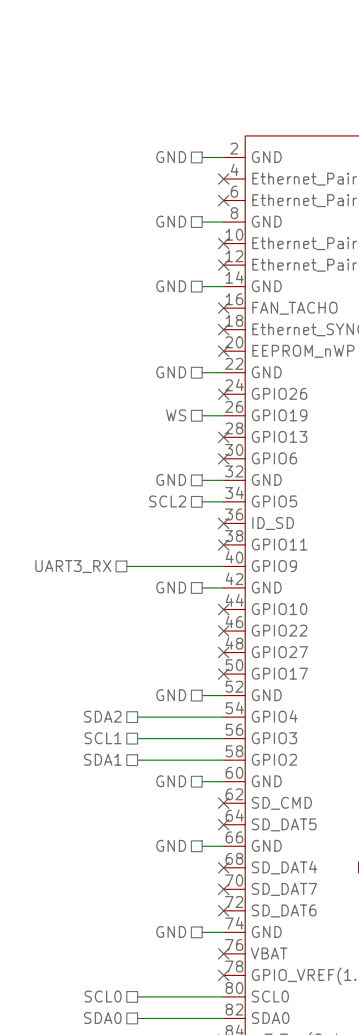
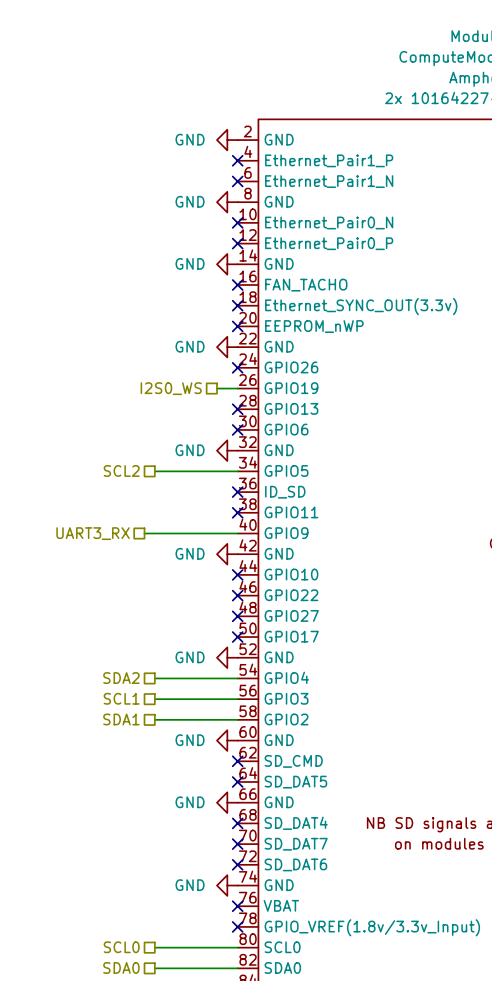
hierarchical label: GND (171, 157) -> none
power symbol: none -> GND (227, 140)
hierarchical label: GND (171, 221) -> none
power symbol: none -> GND (227, 202)
hierarchical label: GND (171, 286) -> none
power symbol: none -> GND (227, 264)
hierarchical label: GND (171, 372) -> none
power symbol: none -> GND (227, 347)
hierarchical label: WS (176, 415) -> I2S0_WS (171, 388)
hierarchical label: GND (171, 479) -> none
power symbol: none -> GND (227, 450)
wire: none -> (154, 471) (216, 471)
hierarchical label position: SCL2 (167, 501) -> SCL2 (121, 470)
hierarchical label: GND (171, 587) -> none
power symbol: none -> GND (227, 554)
hierarchical label: GND (171, 695) -> none
power symbol: none -> GND (227, 657)
hierarchical label: GND (171, 781) -> none
power symbol: none -> GND (227, 740)
hierarchical label: GND (171, 845) -> none
power symbol: none -> GND (227, 802)
hierarchical label: GND (171, 931) -> none
power symbol: none -> GND (227, 885)

